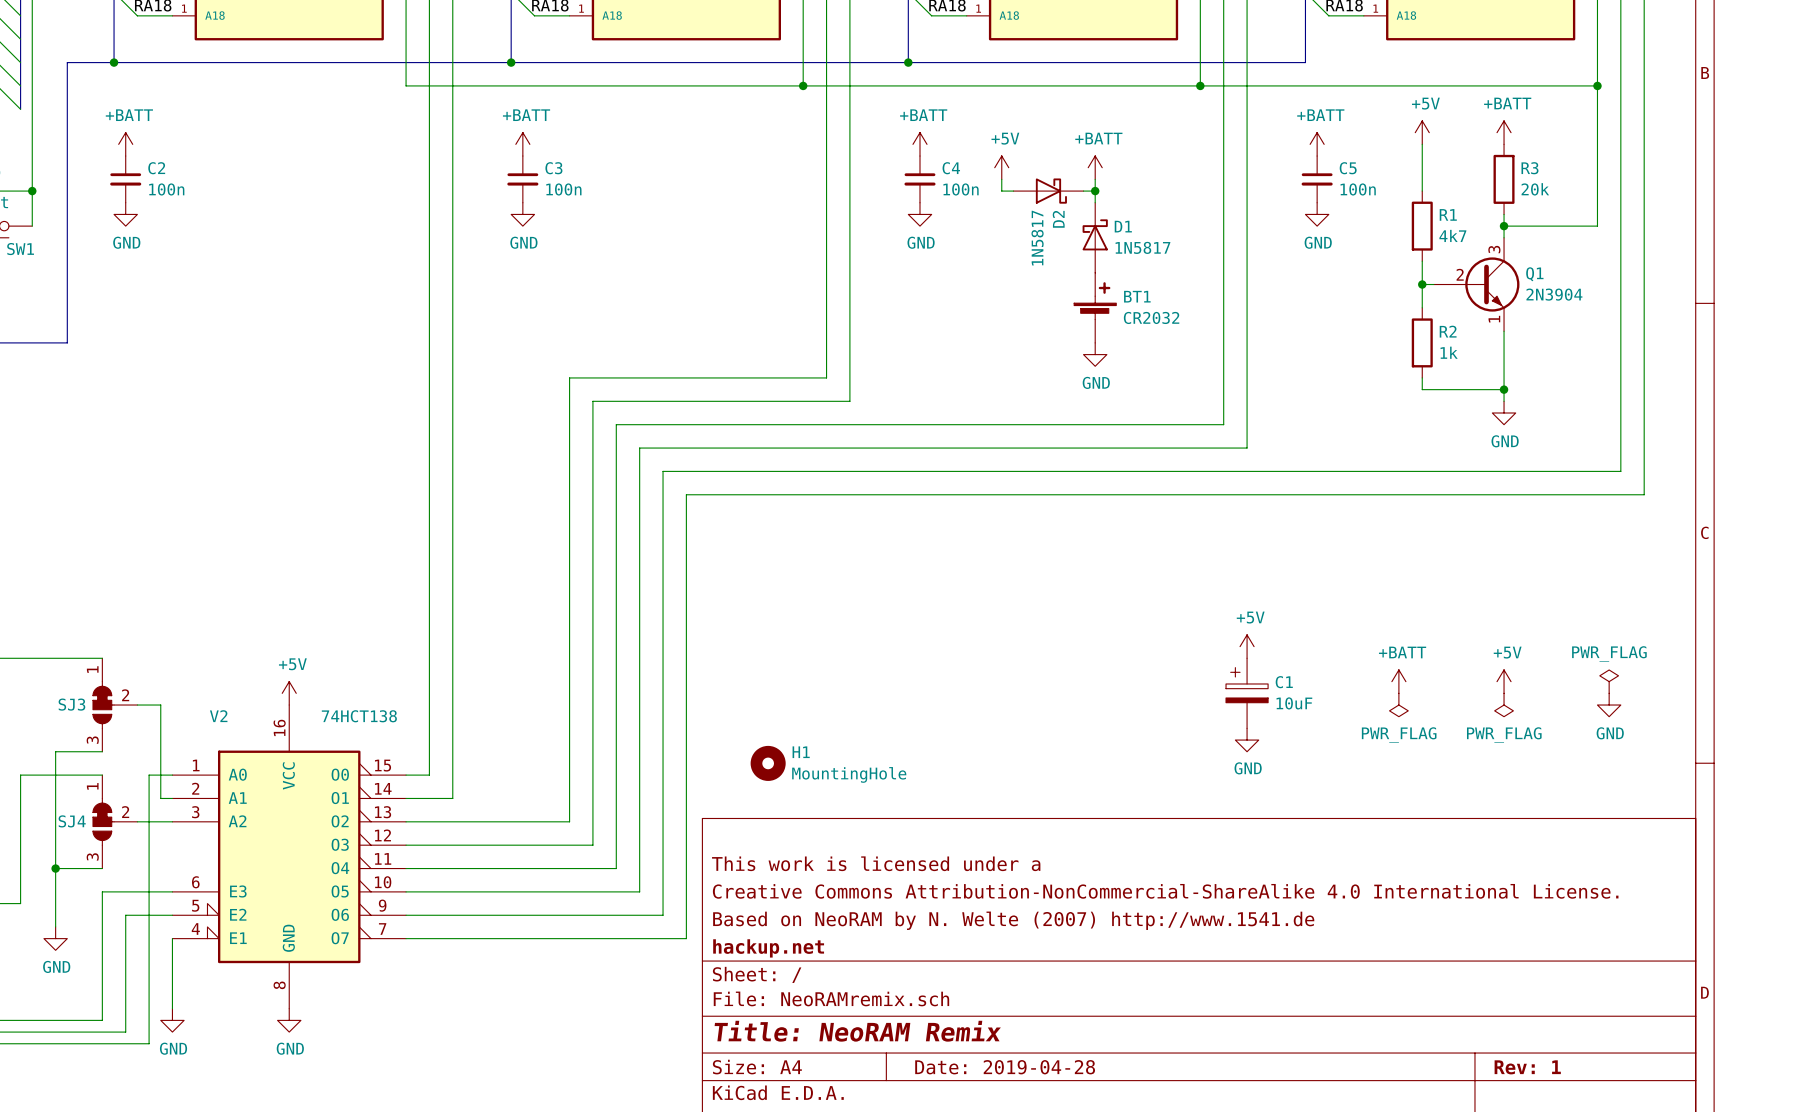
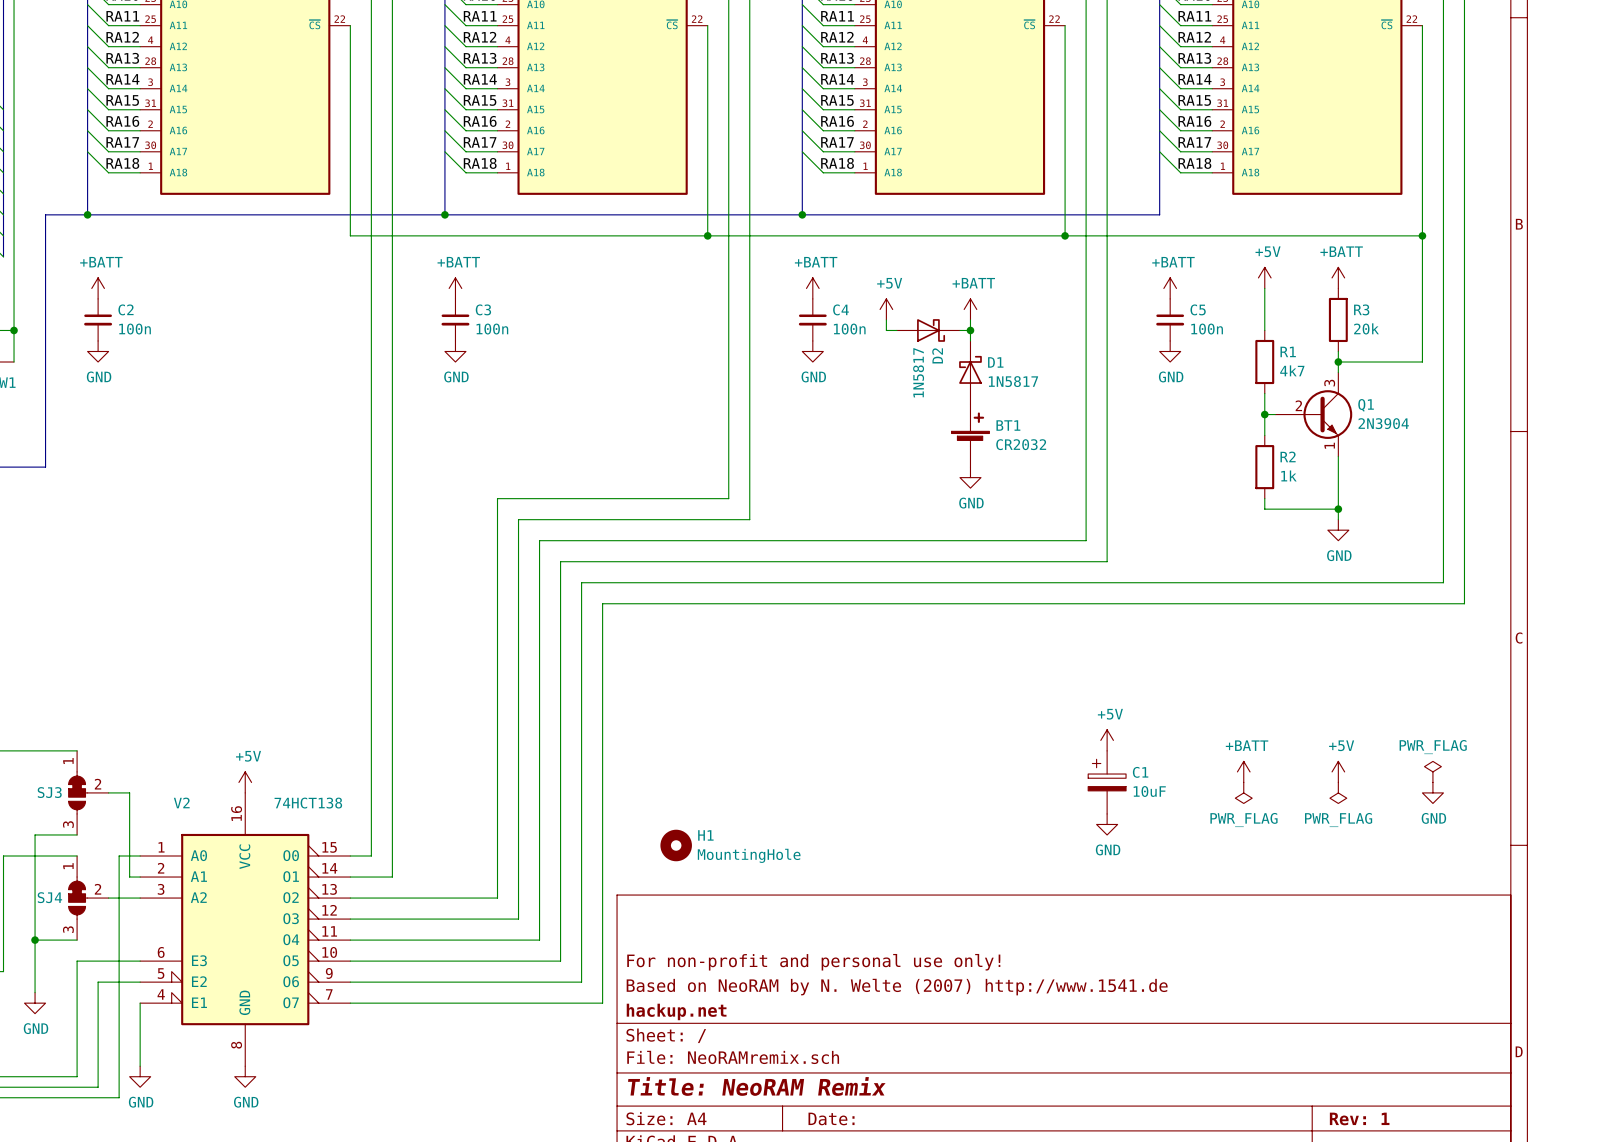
title block: This work is licensed under a (876, 863) -> none
title block: Creative Commons Attribution-NonCommercial-ShareAlike 4.0 International License. (1165, 891) -> For non-profit and personal use only! (813, 962)
title block: Date: 2019-04-28 (1005, 1067) -> Date: (831, 1118)

